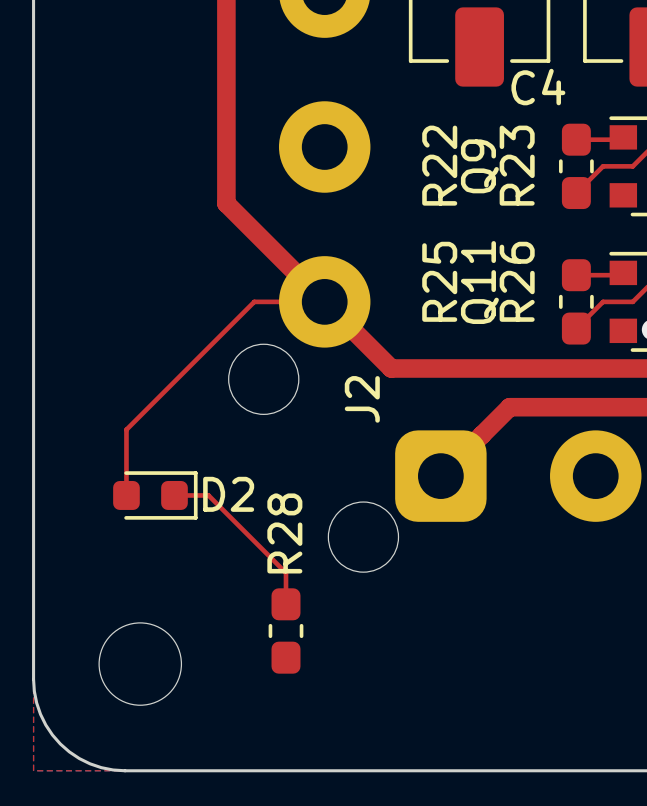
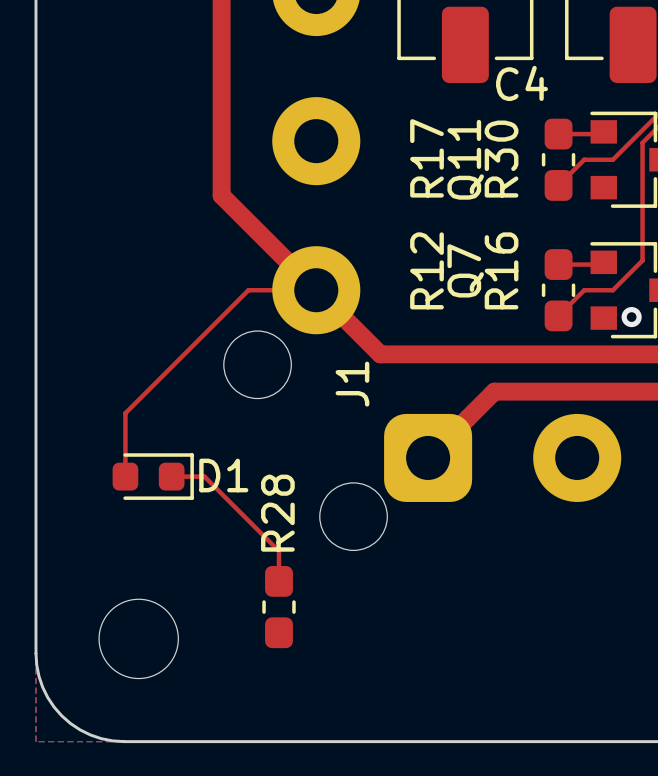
R22 name: R22 (439, 165) -> R17 (427, 158)
R23 name: R23 (517, 165) -> R30 (501, 159)
Q9 name: Q9 (479, 166) -> Q11 (465, 159)
R25 name: R25 (439, 281) -> R12 (427, 270)
R26 name: R26 (517, 281) -> R16 (501, 270)
Q11 name: Q11 (479, 282) -> Q7 (465, 270)
J2 name: J2 (362, 399) -> J1 (352, 384)
D2 name: D2 (228, 494) -> D1 (223, 475)

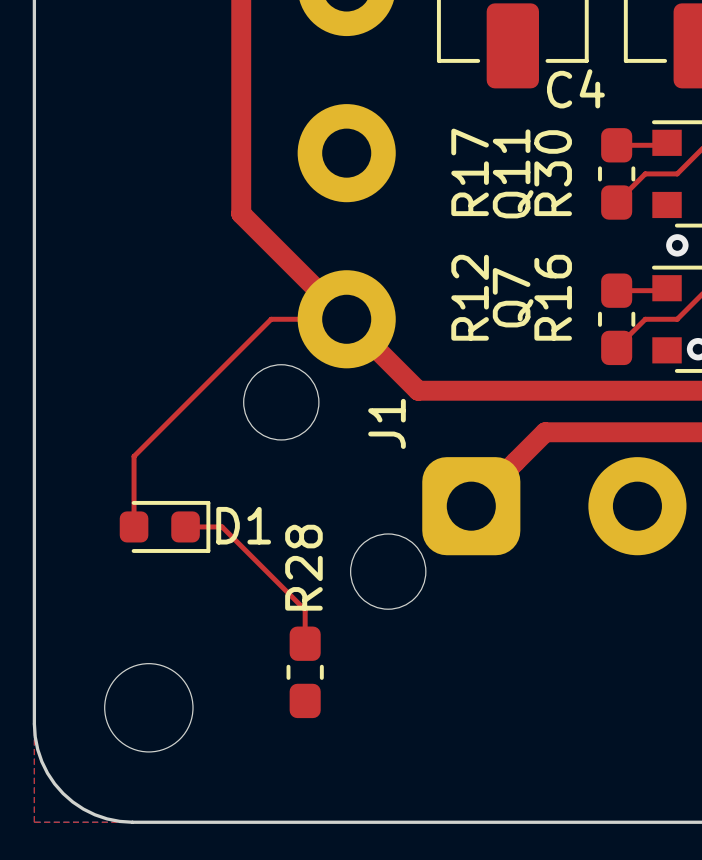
via: none -> (677, 245)

